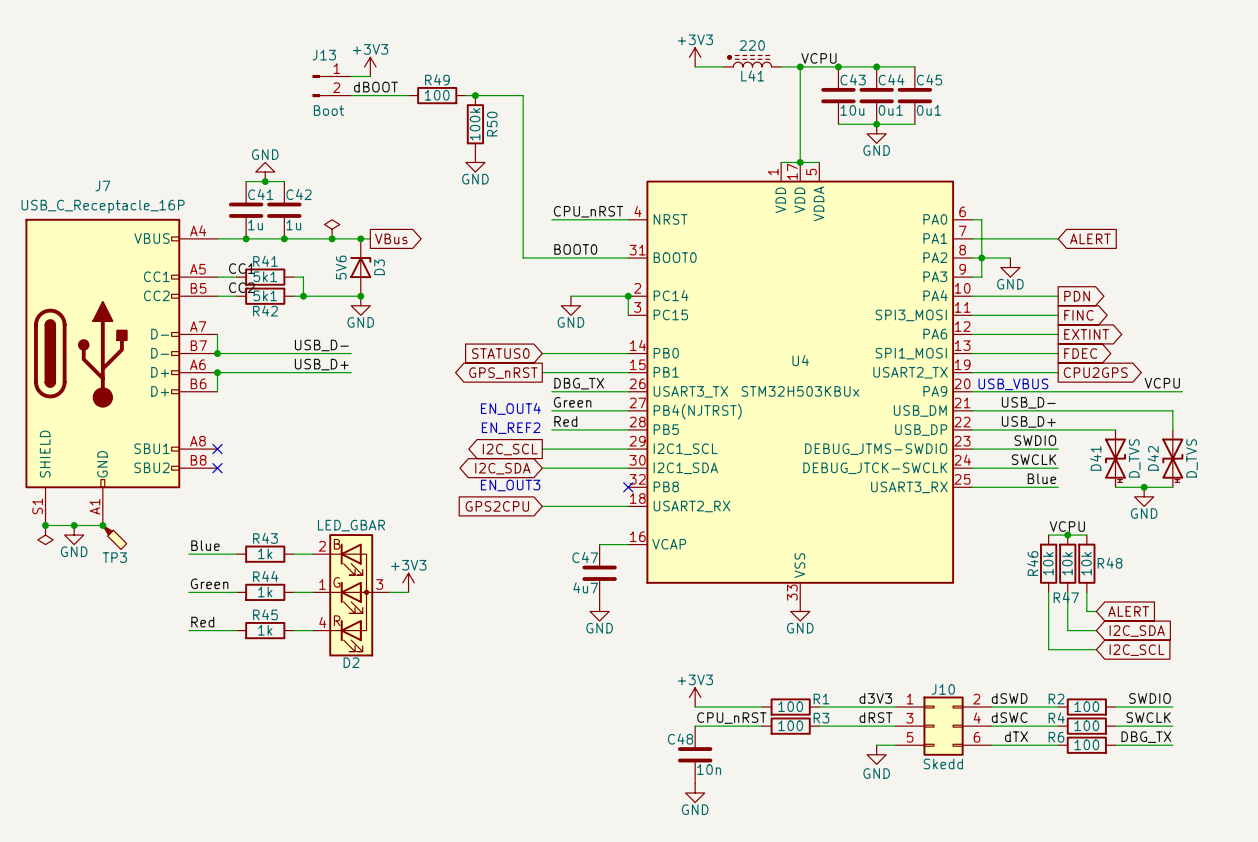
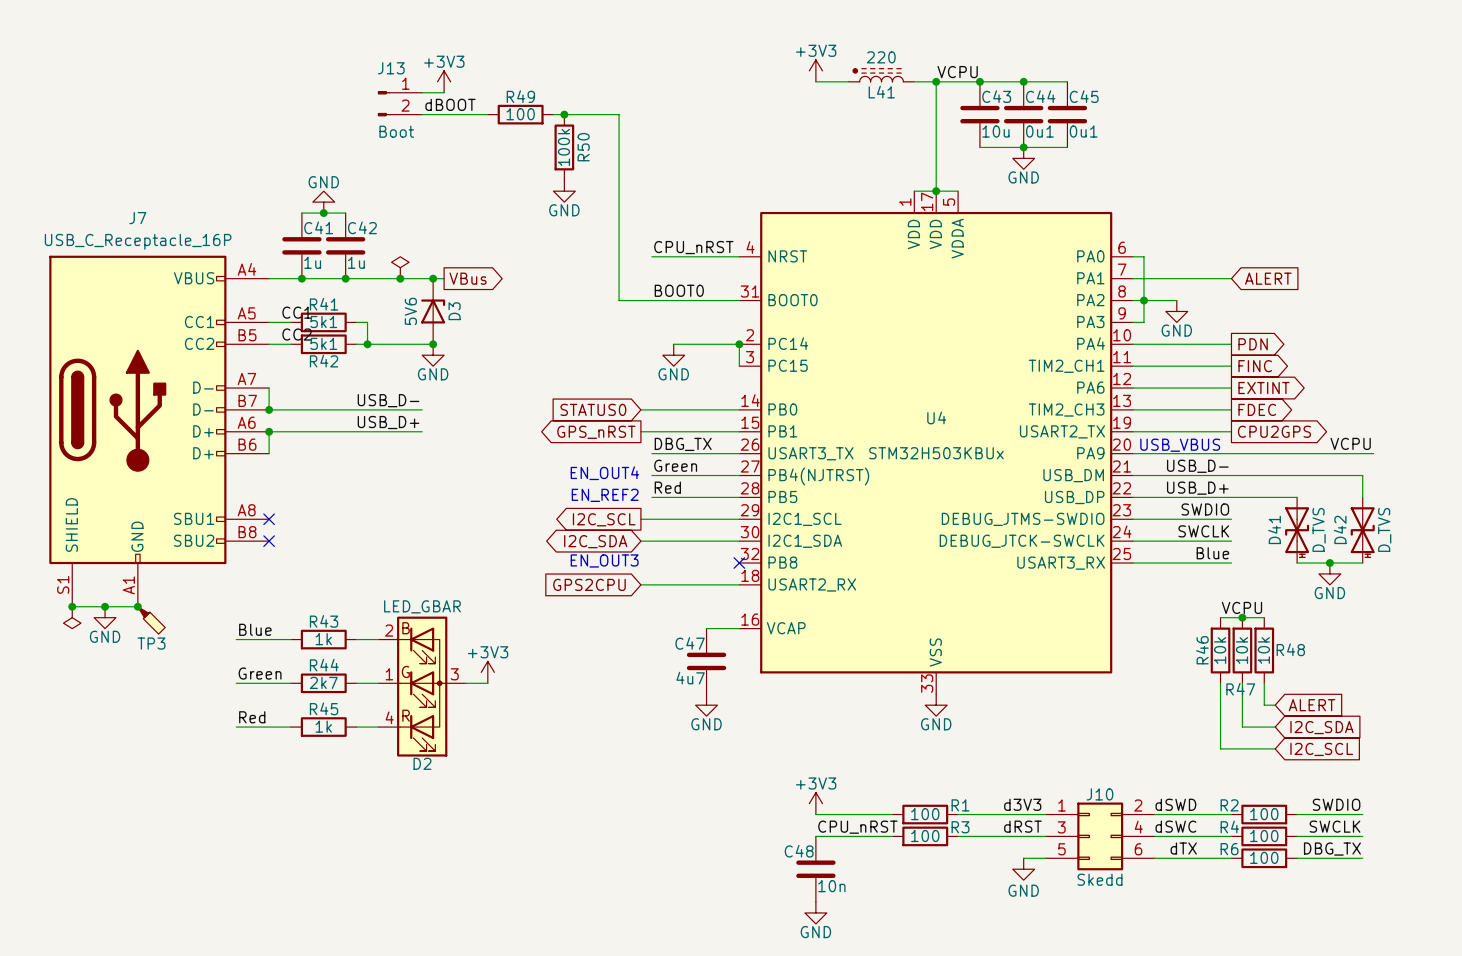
U4 pin name: SPI3_MOSI (911, 315) -> TIM2_CH1 (1066, 366)
U4 pin name: SPI1_MOSI (911, 353) -> TIM2_CH3 (1066, 410)
R44 value: 1k (265, 592) -> 2k7 (323, 682)

